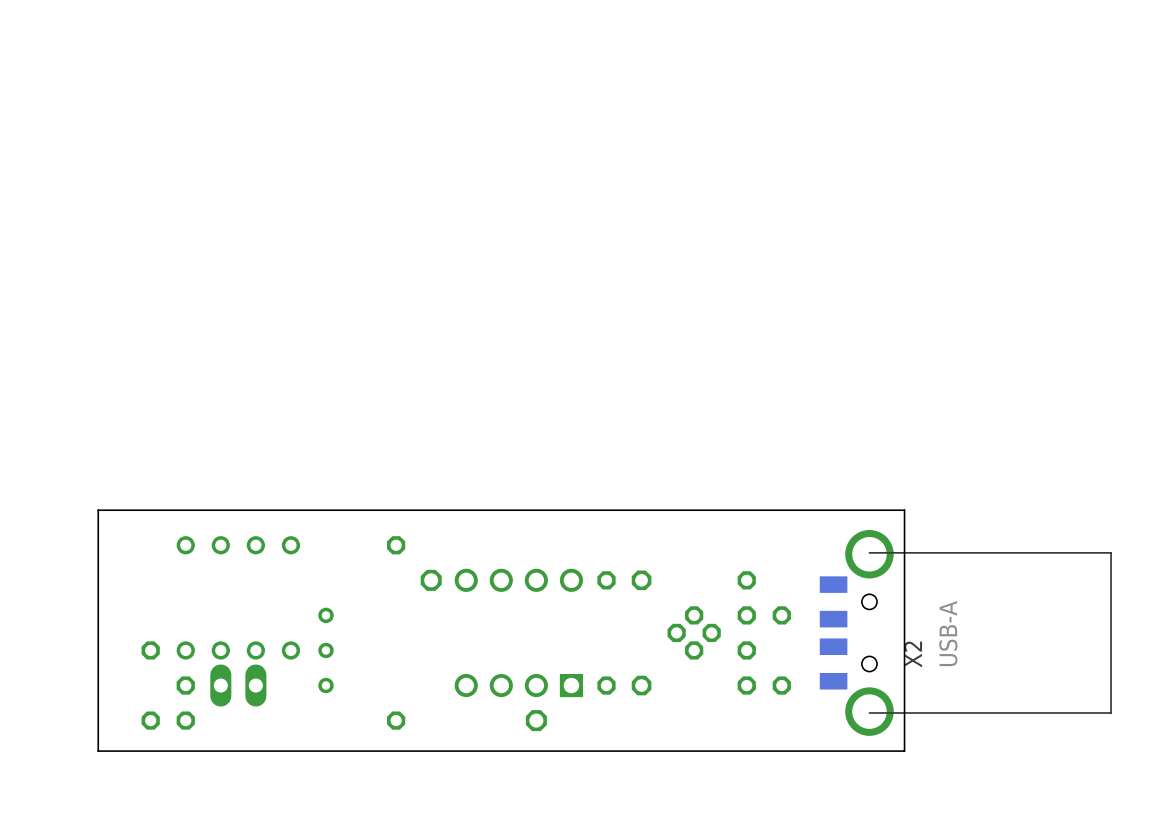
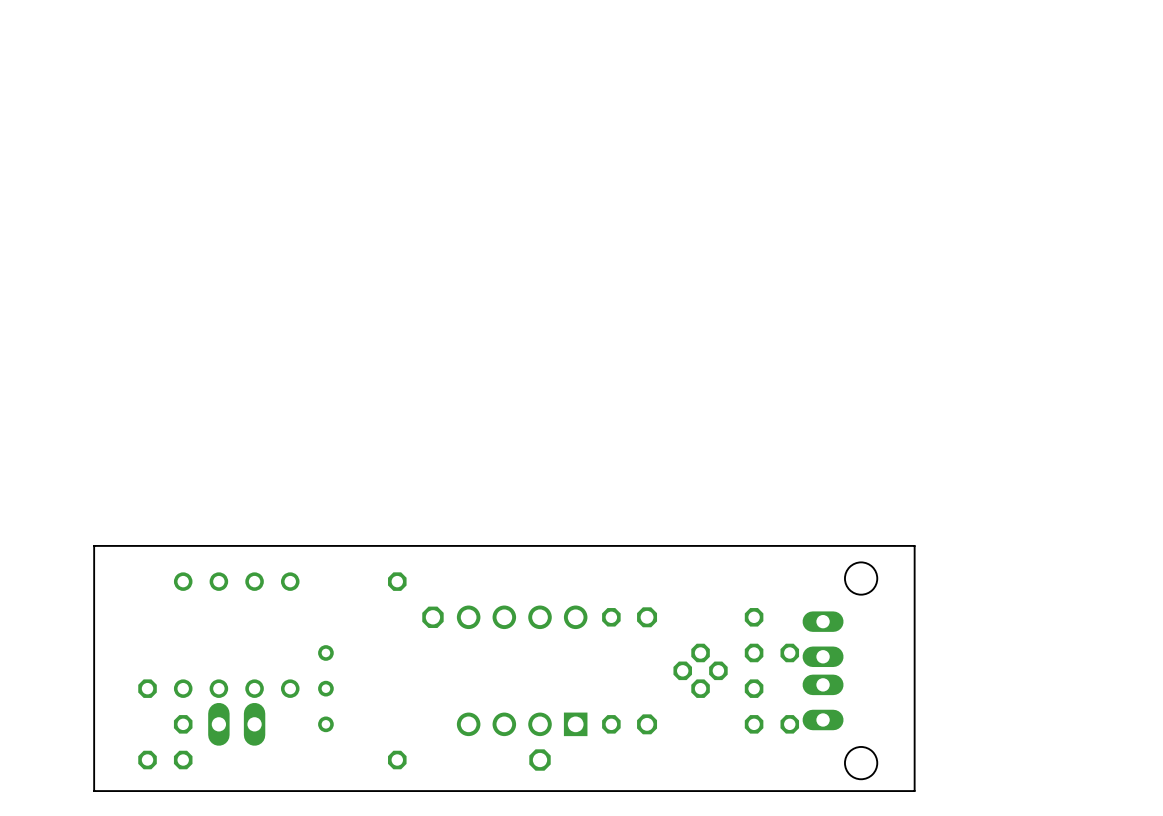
part: none -> (839, 670)
X2: USB-A (965, 632) -> none

